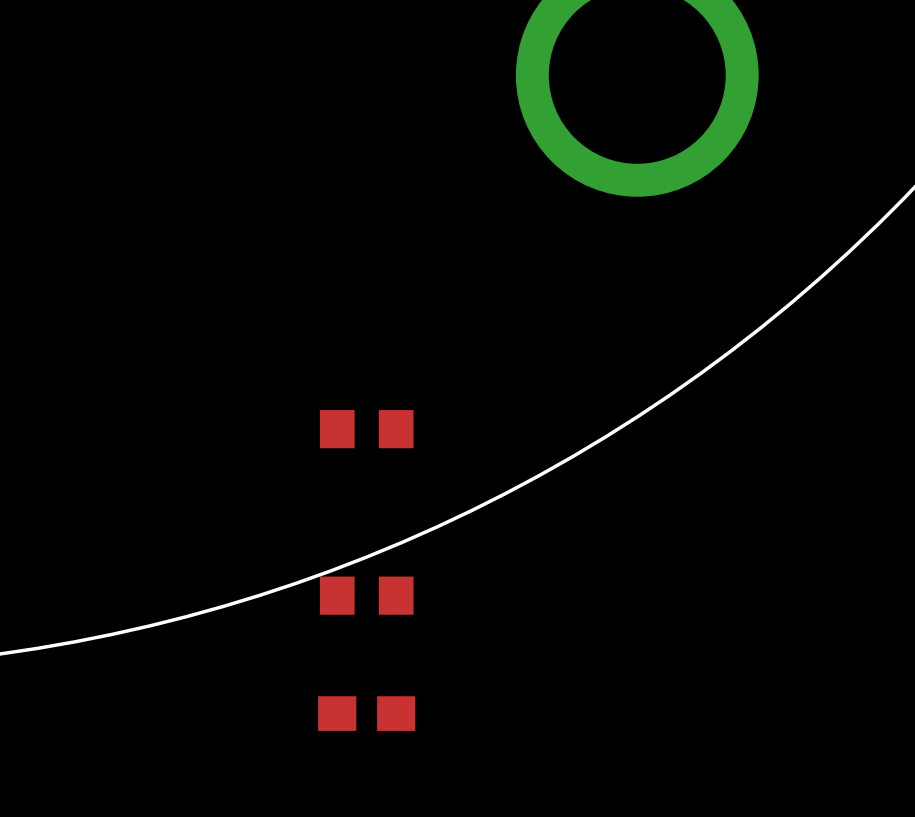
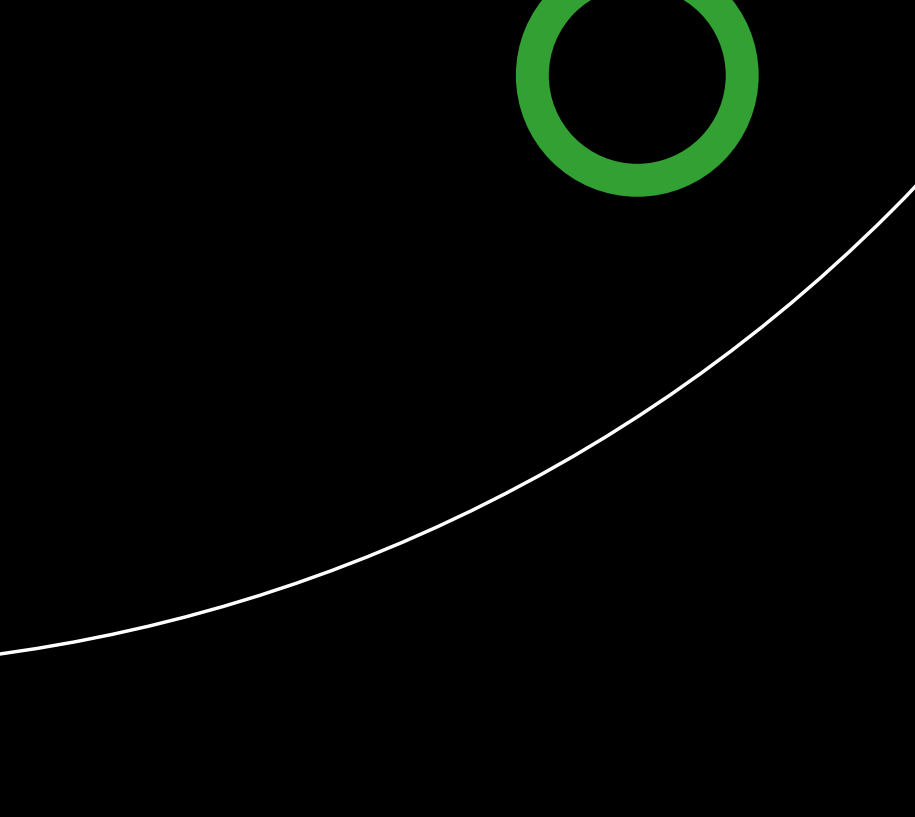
part: (366, 429) -> none
part: (366, 595) -> none
part: (366, 713) -> none

